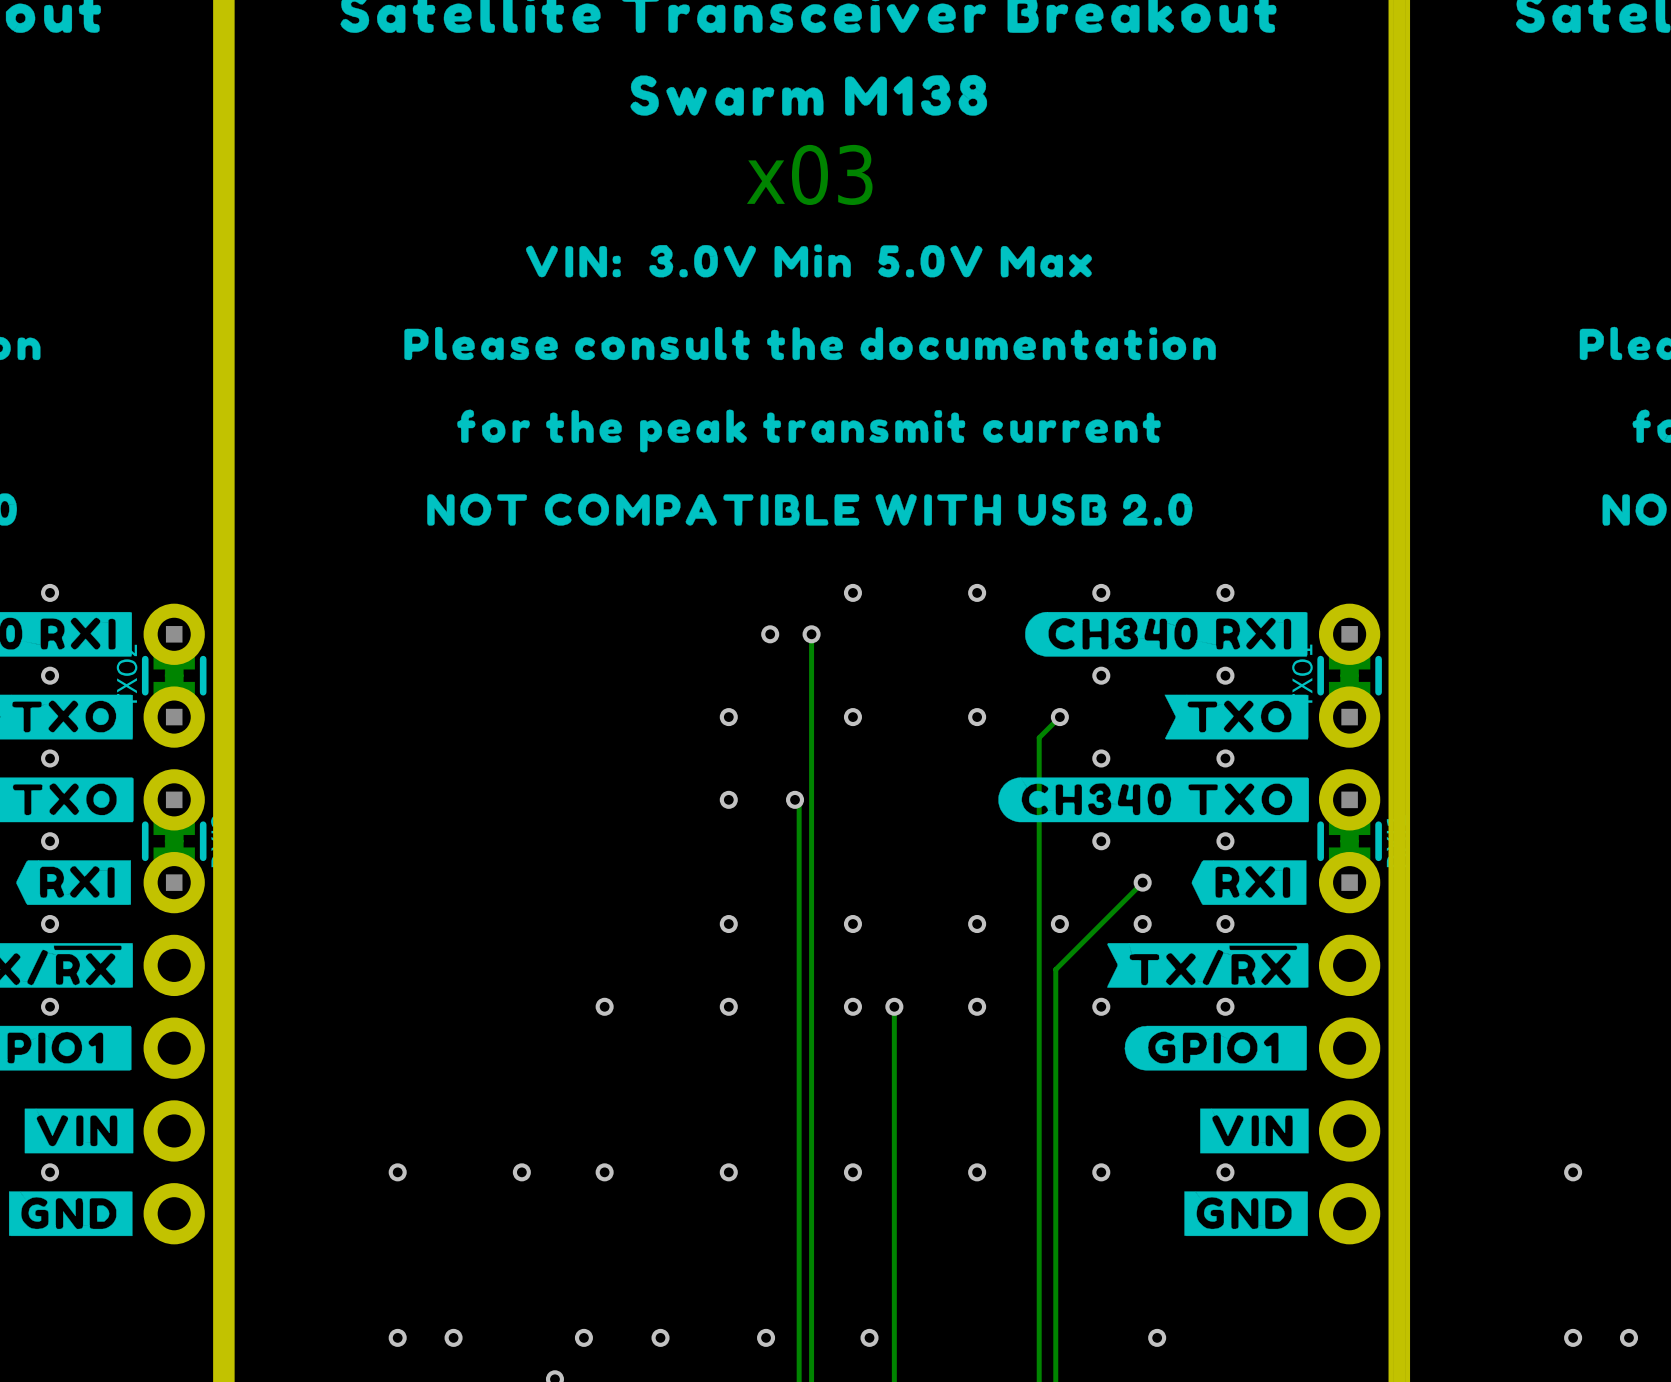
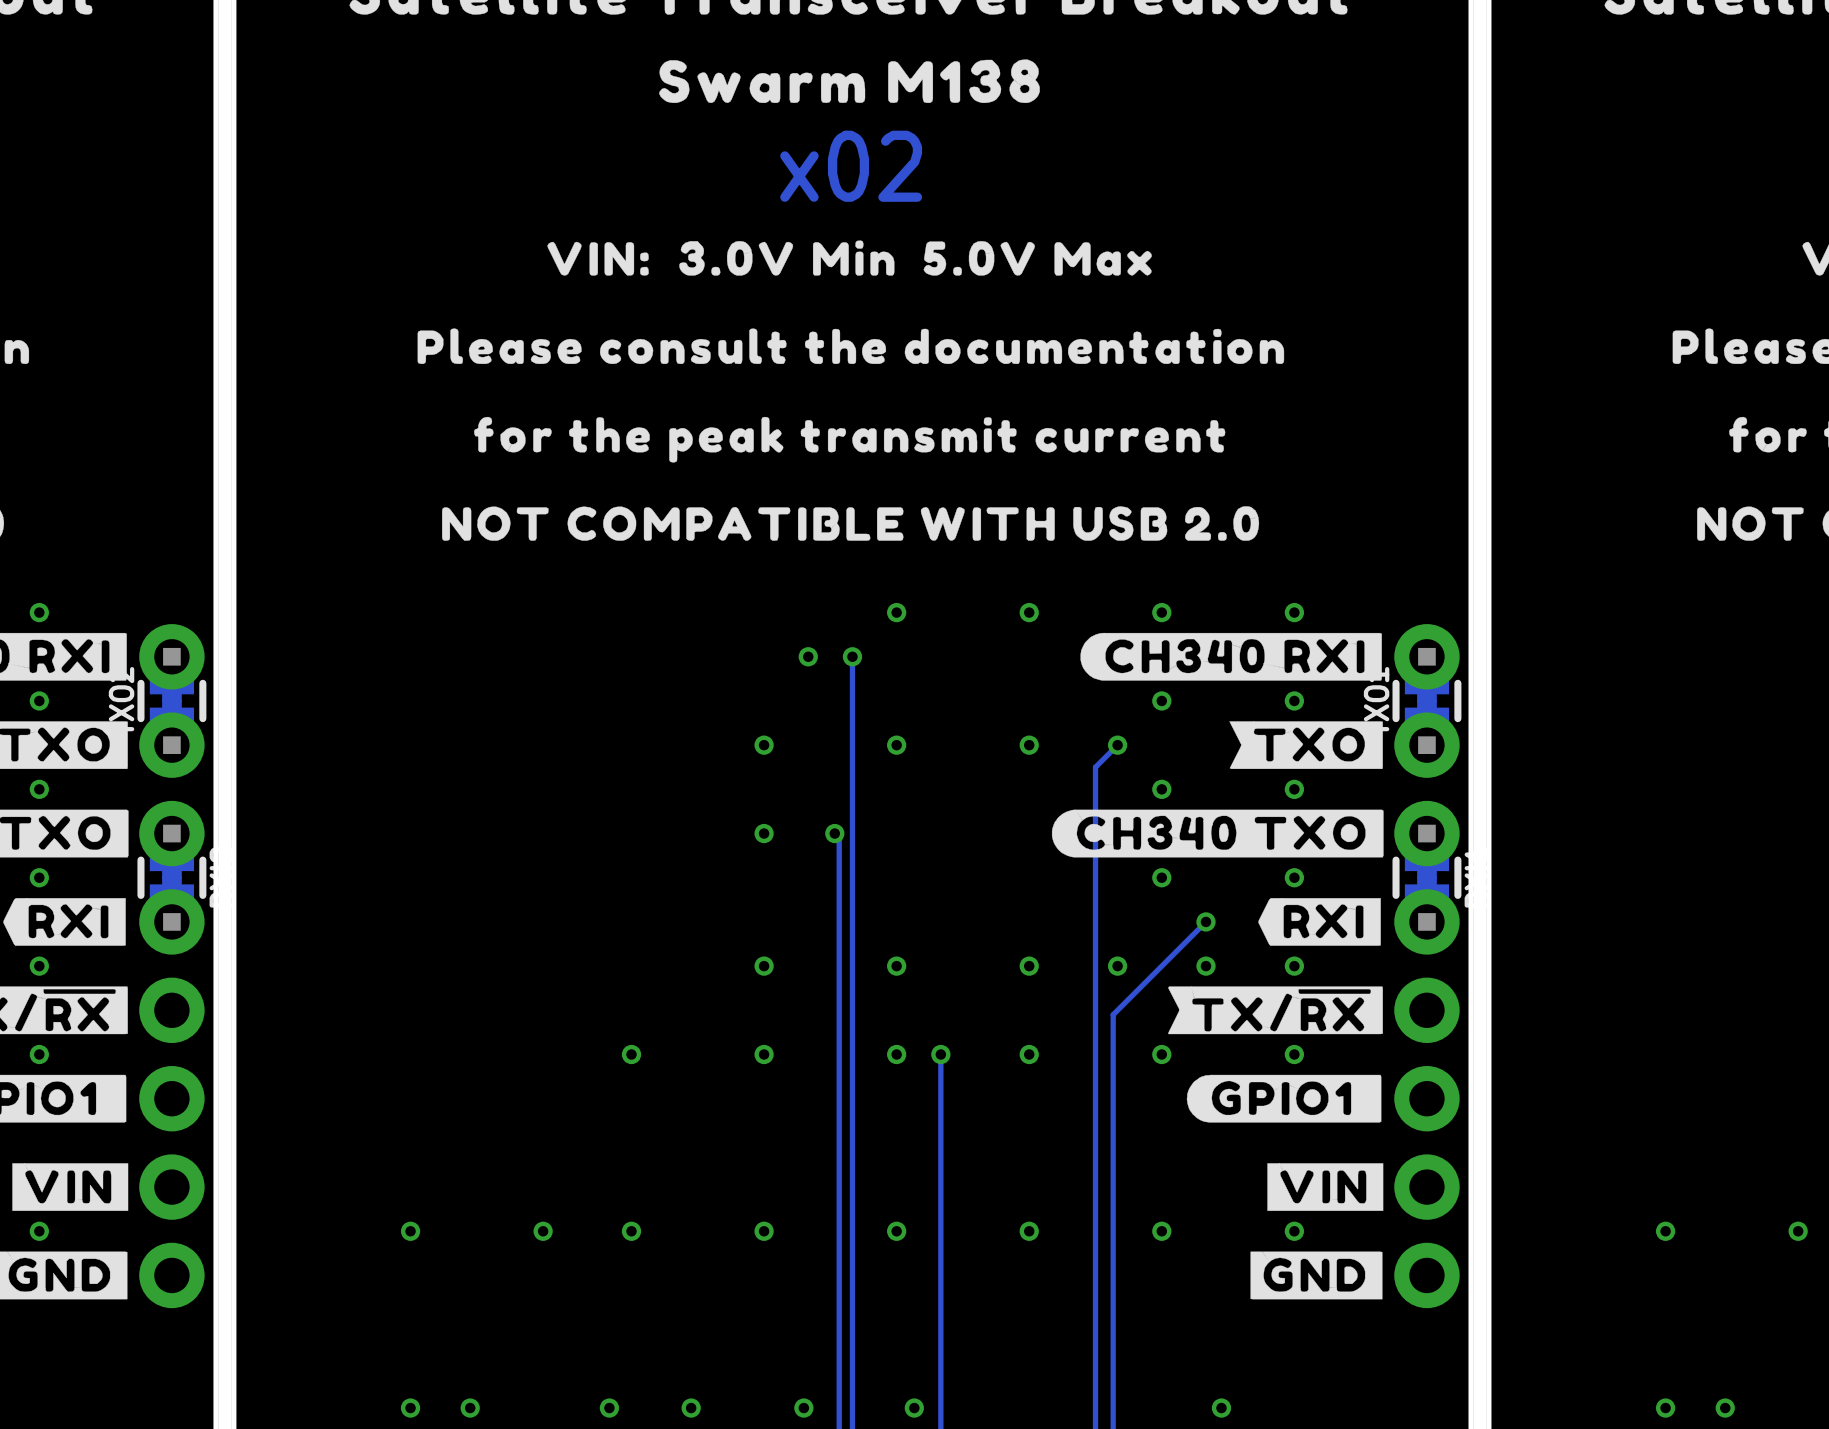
text: x03 (809, 174) -> x02 (851, 166)

